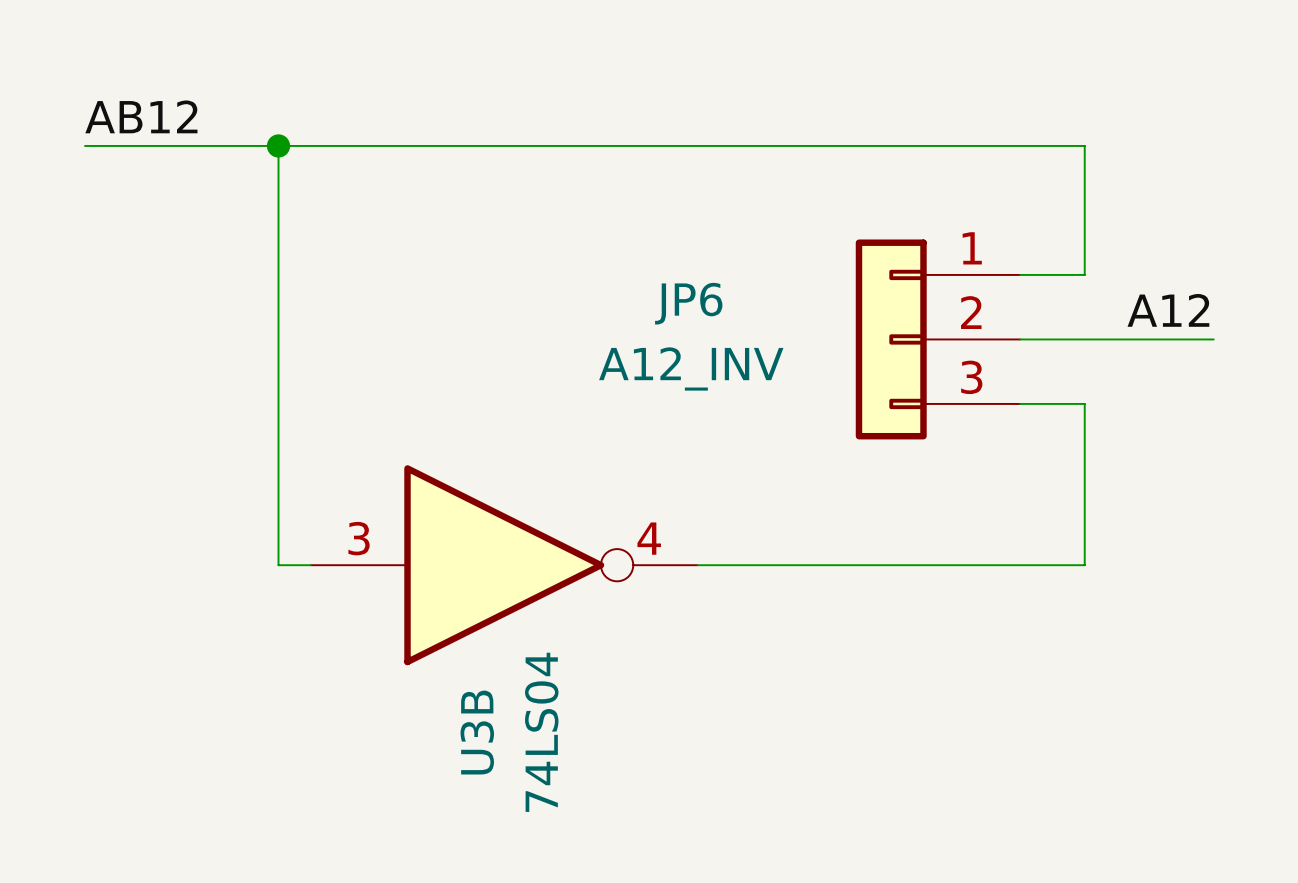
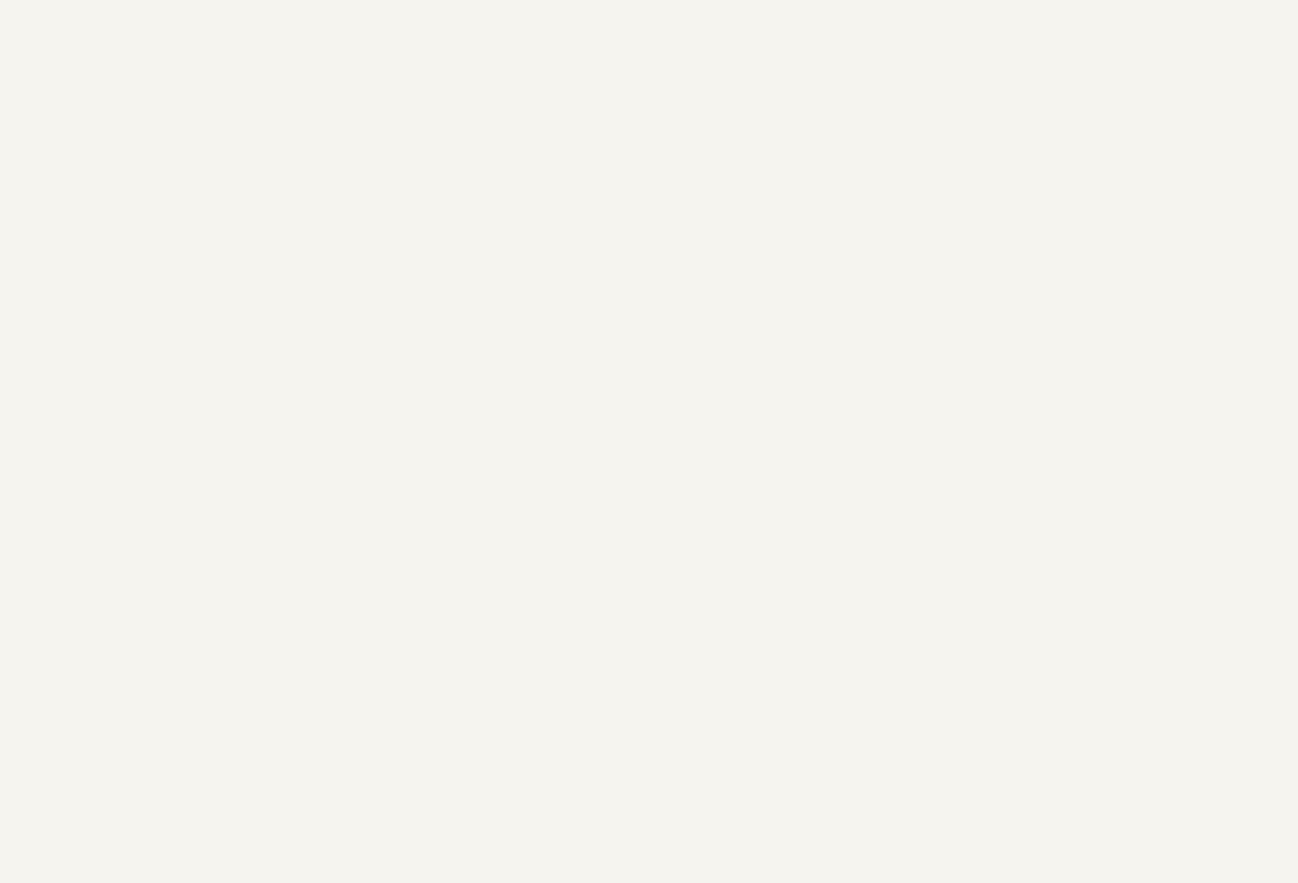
label: AB12 (141, 116) -> none
wire: (85, 145) (1084, 145) (1084, 274) (1020, 274) -> none
wire: (278, 145) (278, 565) (310, 565) -> none
junction: (278, 145) -> none
label: A12 (1168, 310) -> none
JP6: A12_INV (937, 339) -> none
wire: (1020, 339) (1213, 339) -> none
wire: (1020, 403) (1084, 403) (1084, 565) (697, 565) -> none
U3B: 74LS04 (504, 565) -> none

